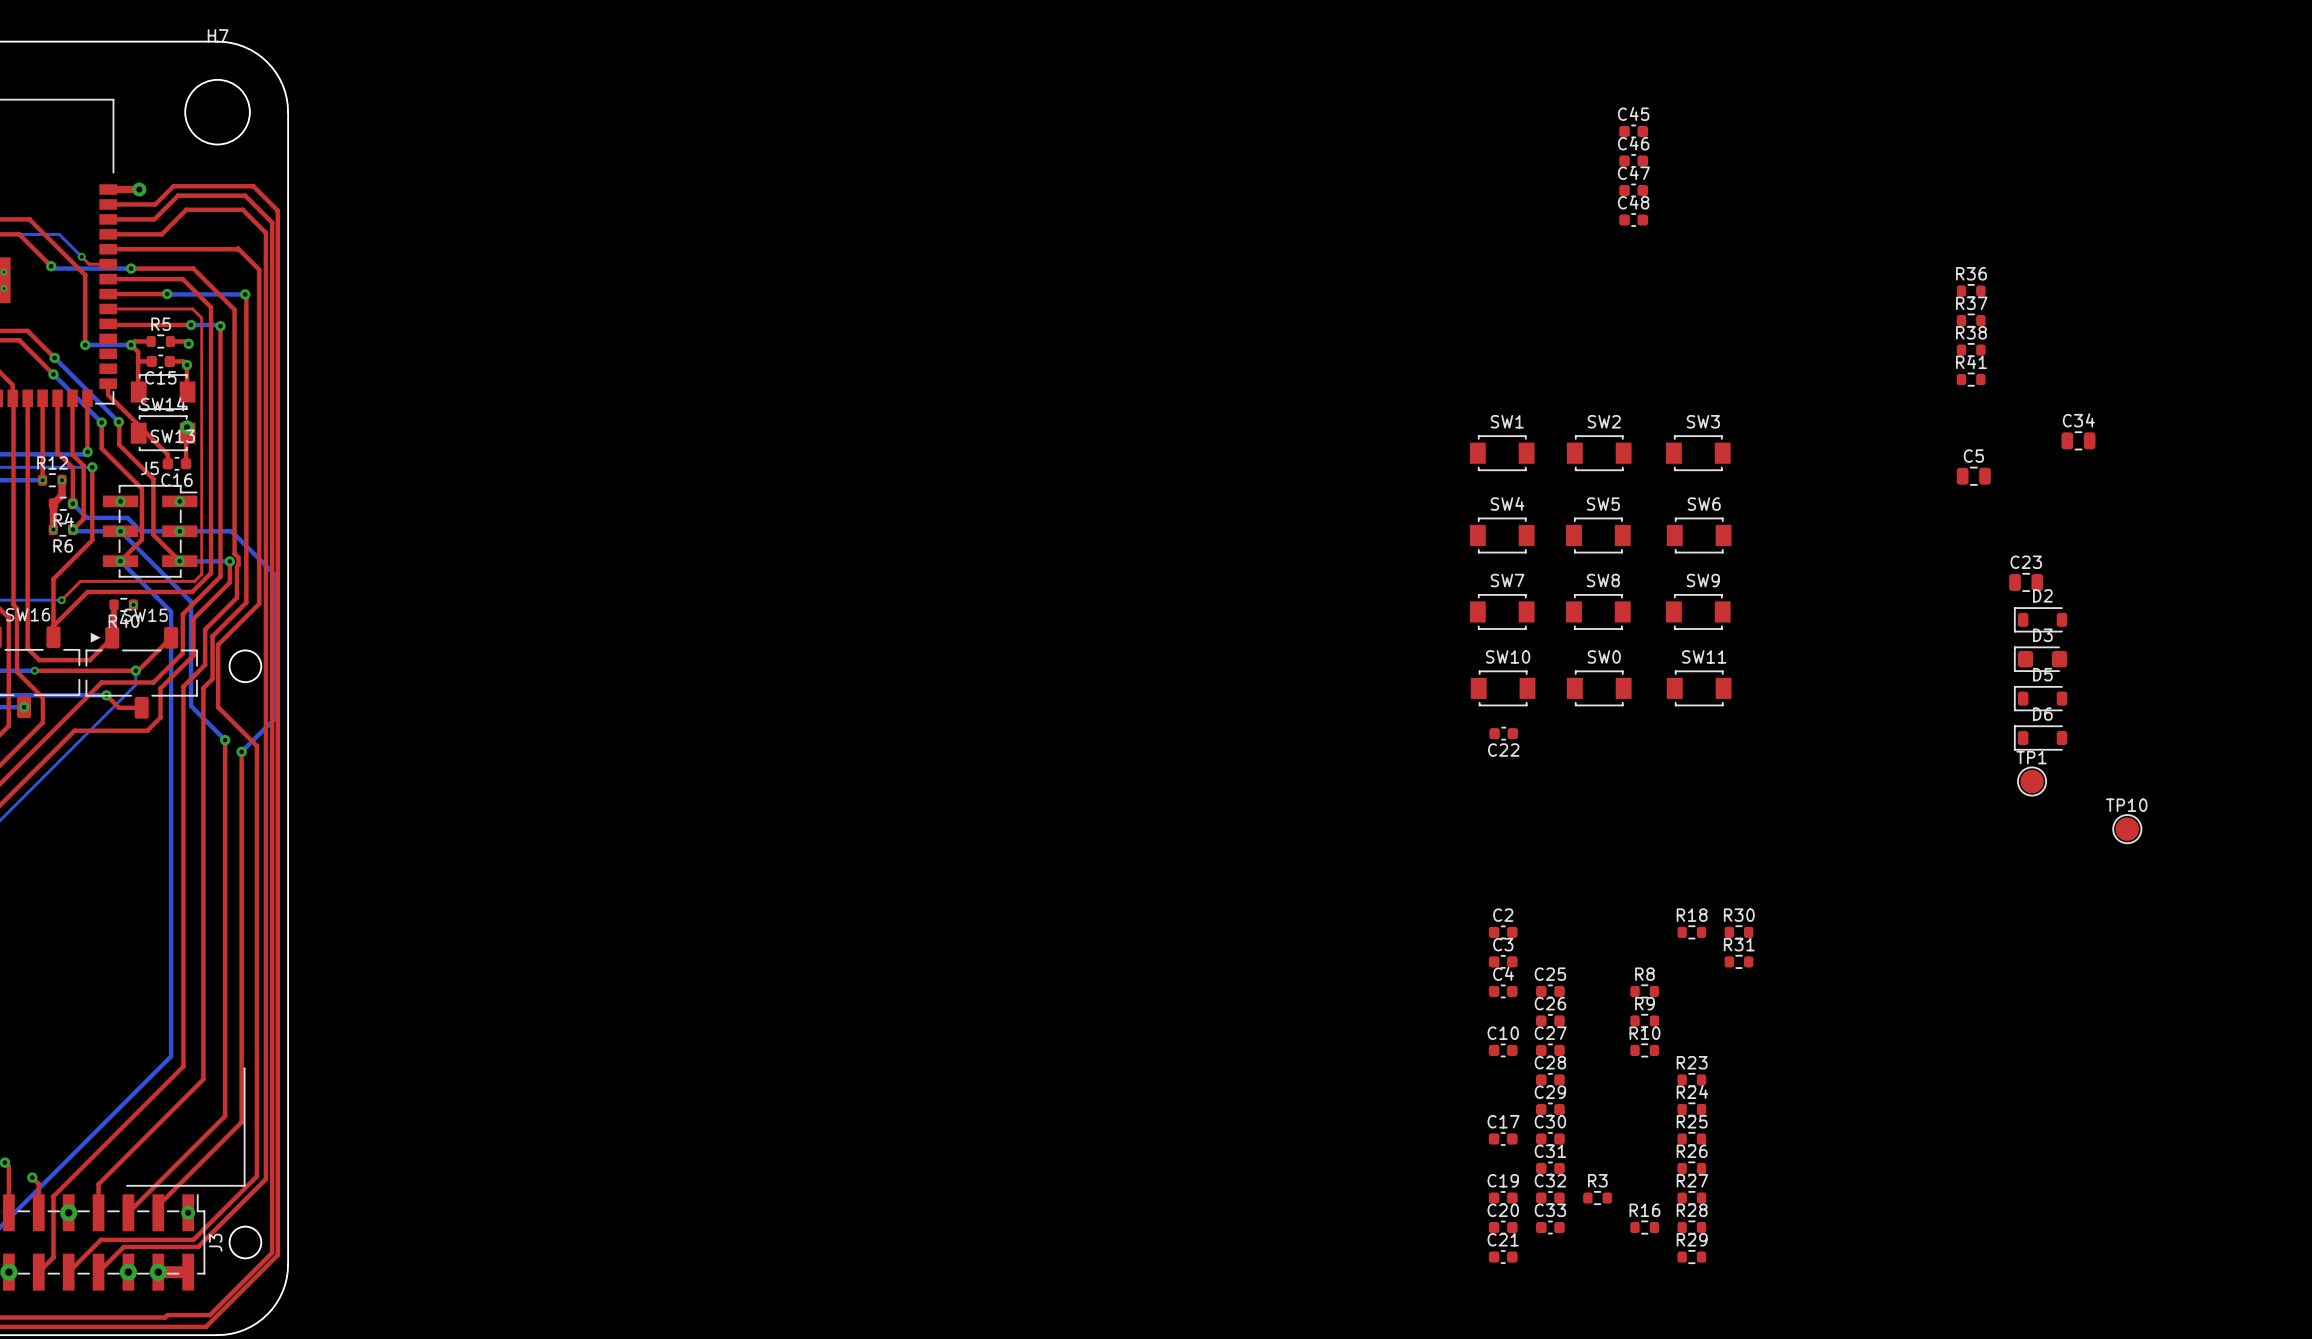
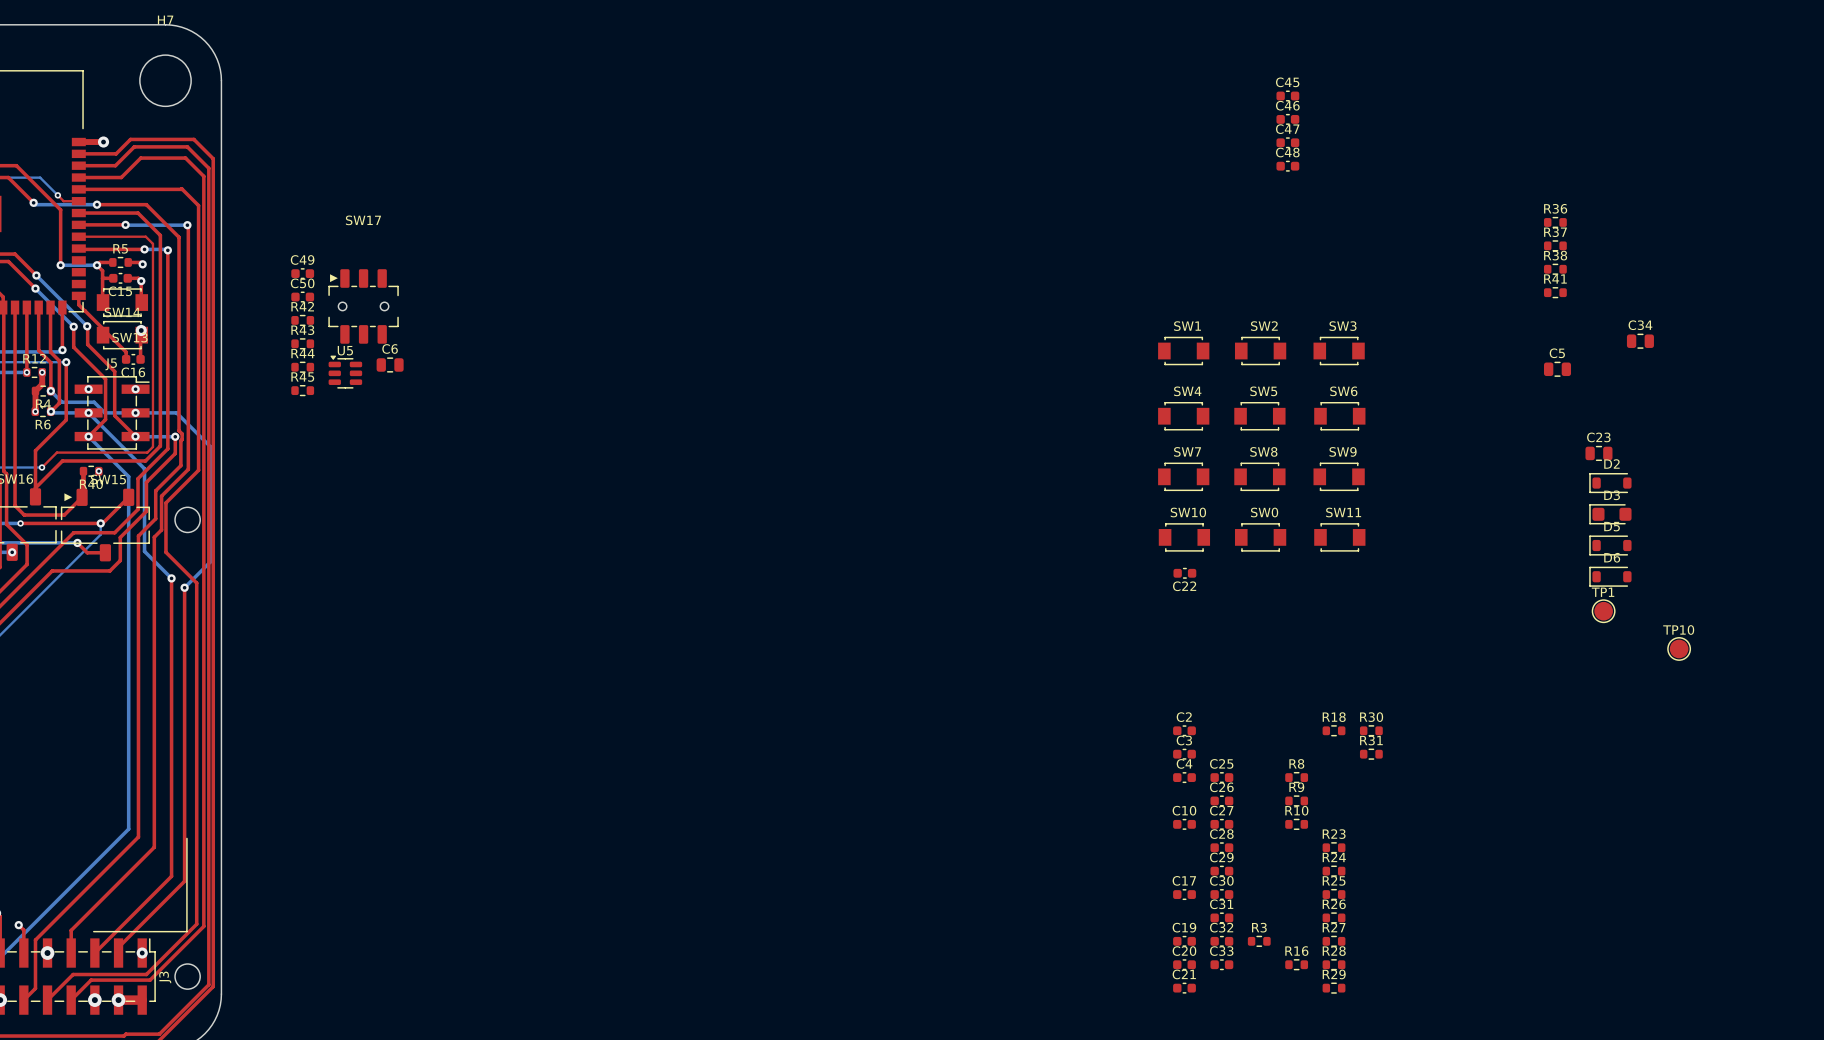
C49: none -> (302, 273)
C50: none -> (302, 297)
SW17: none -> (363, 306)
R42: none -> (302, 320)
R43: none -> (302, 343)
C6: none -> (390, 364)
R44: none -> (302, 367)
U5: none -> (345, 372)
R45: none -> (302, 390)

